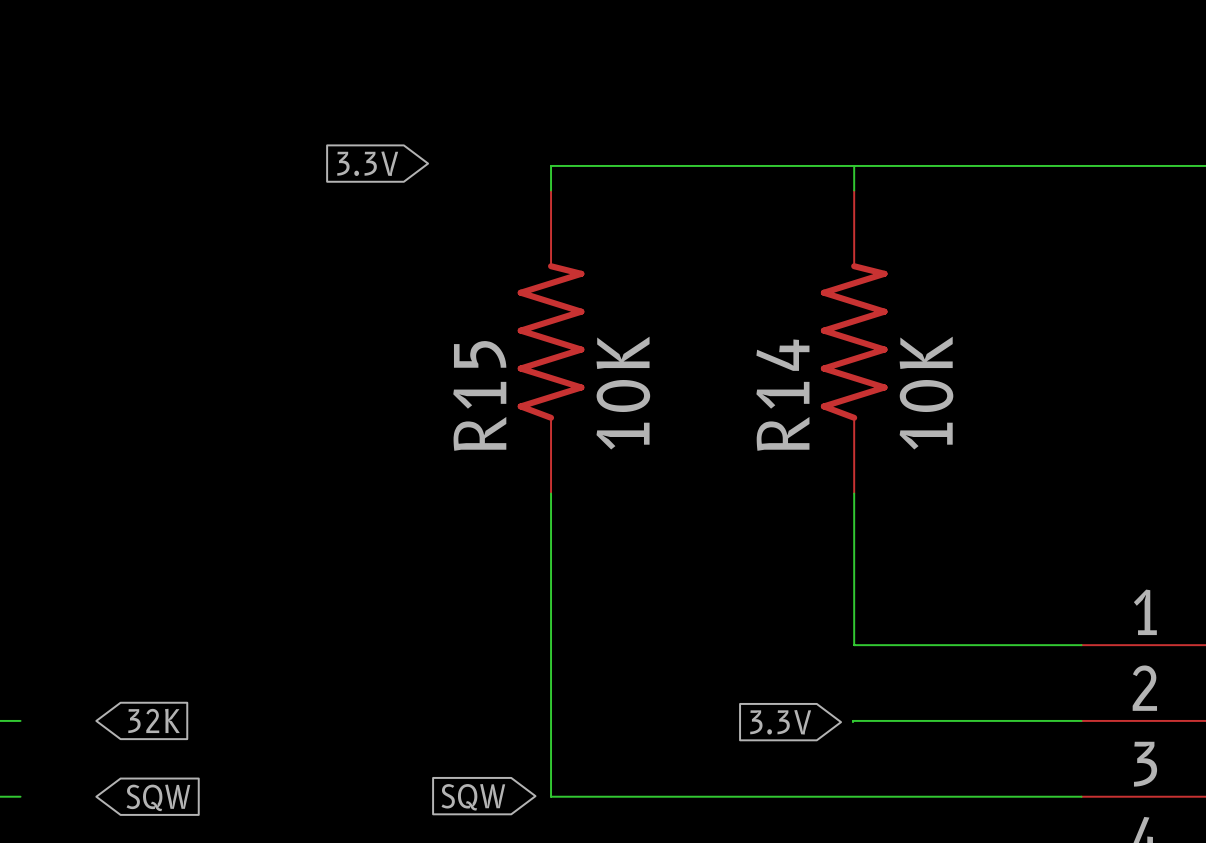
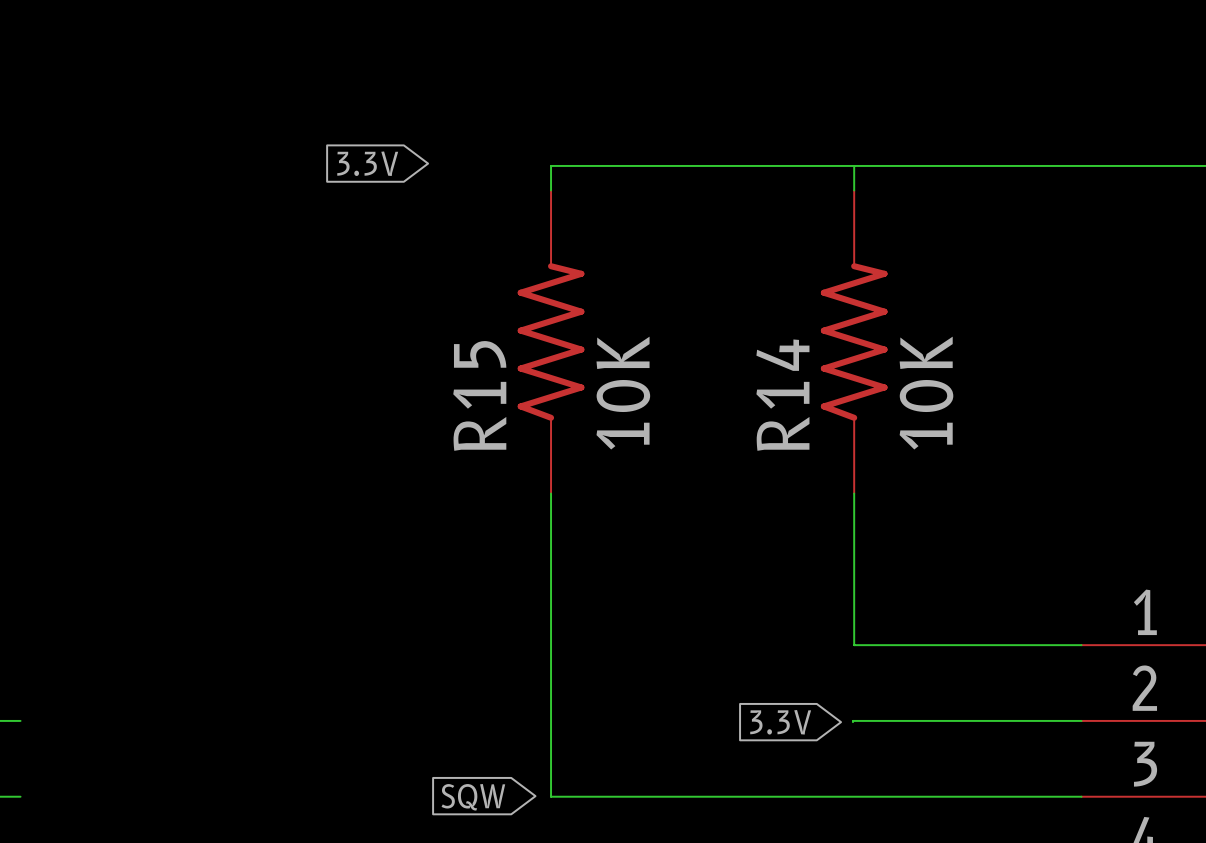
global label: 32K (154, 720) -> none
global label: SQW (158, 797) -> none

